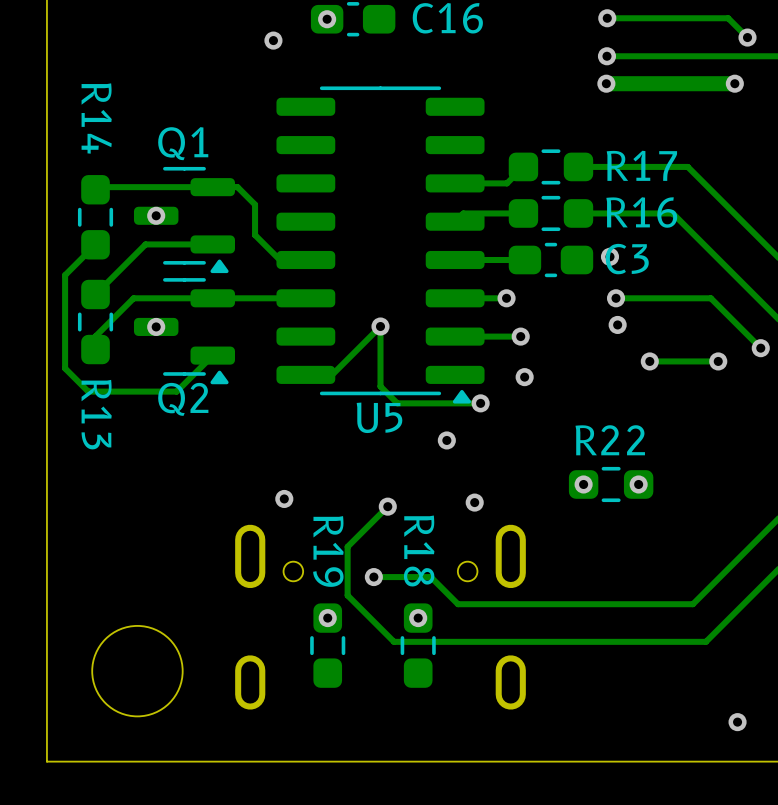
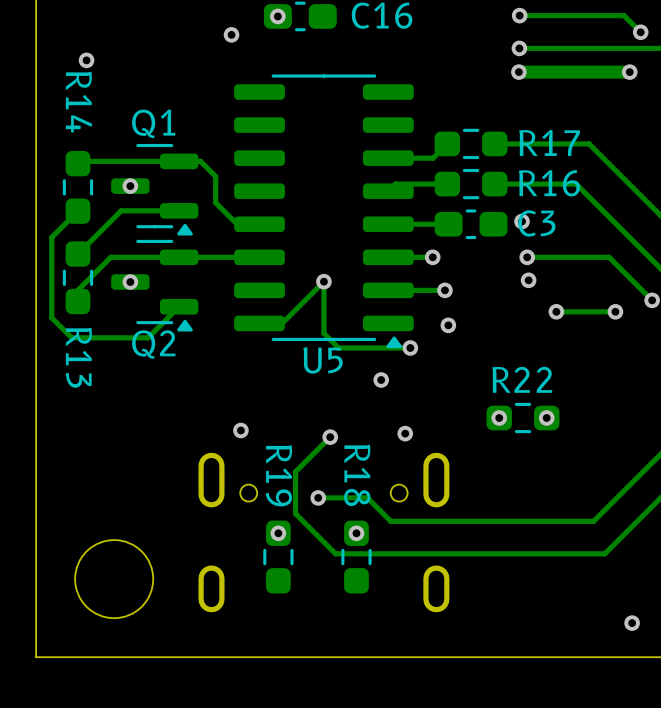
via: none -> (86, 60)

